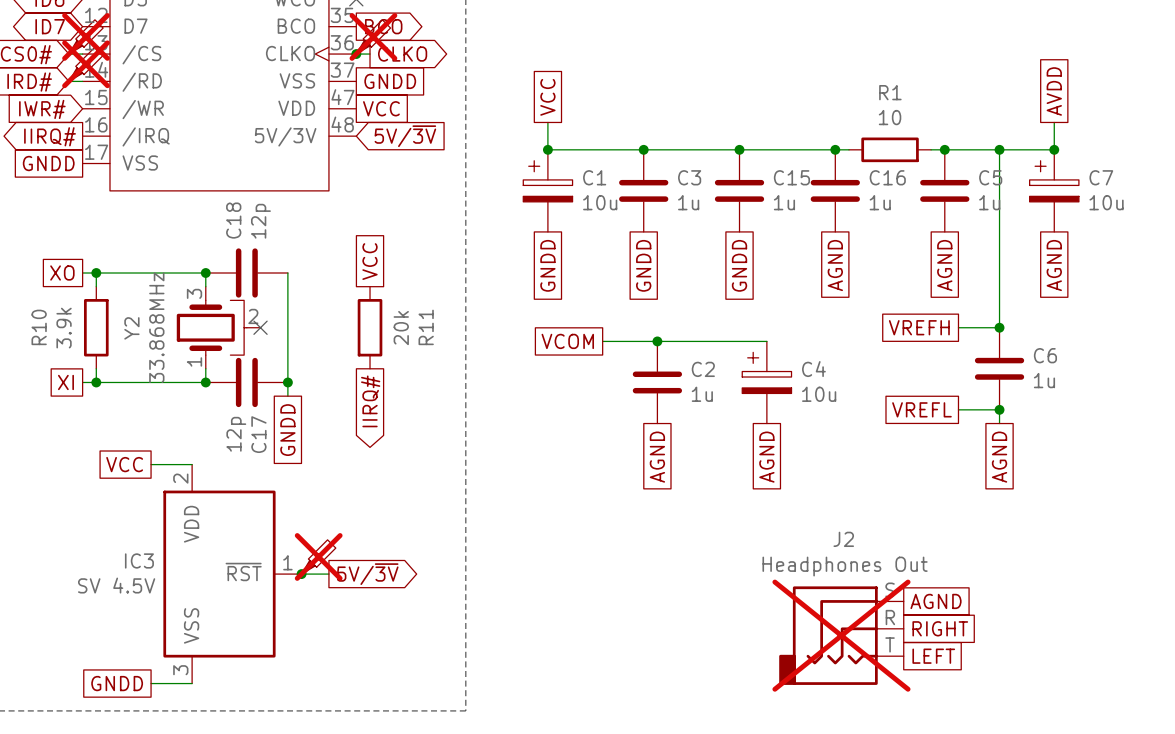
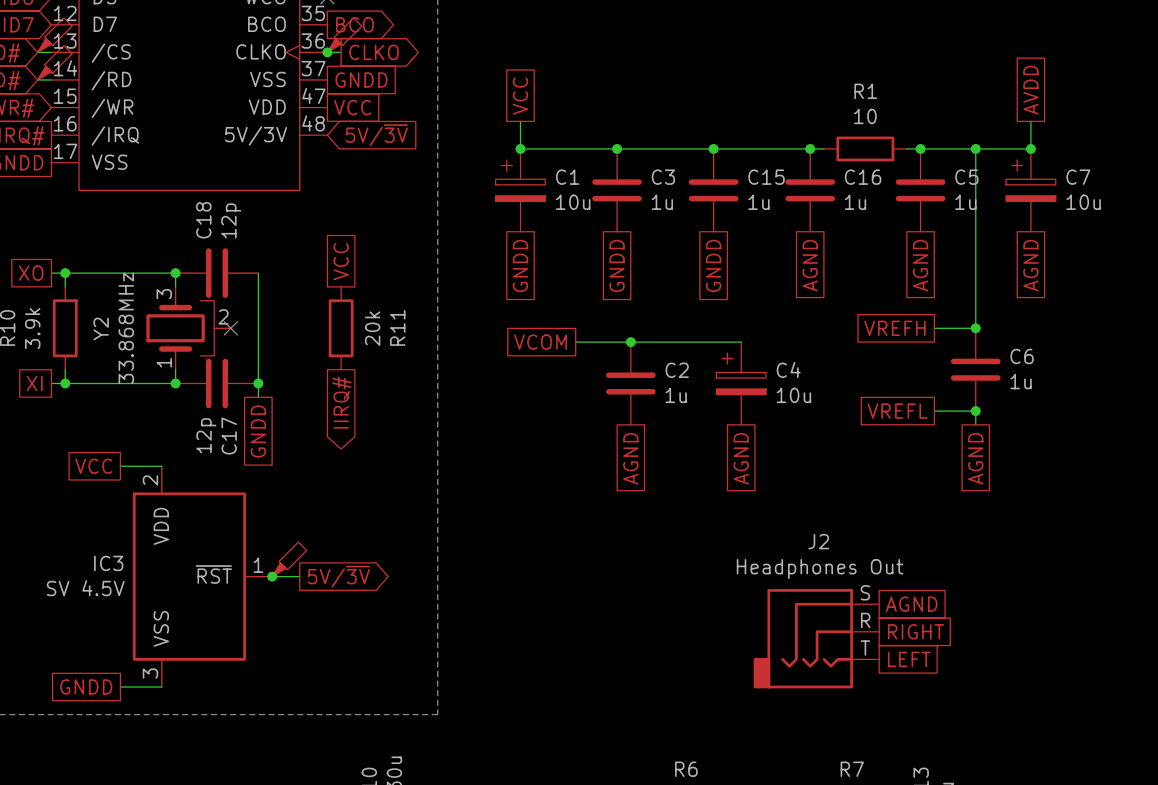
part do-not-place cross: (86, 36) -> none
part do-not-place cross: (373, 36) -> none
part do-not-place cross: (86, 64) -> none
part do-not-place cross: (318, 556) -> none
J2 do-not-place cross: (841, 635) -> none

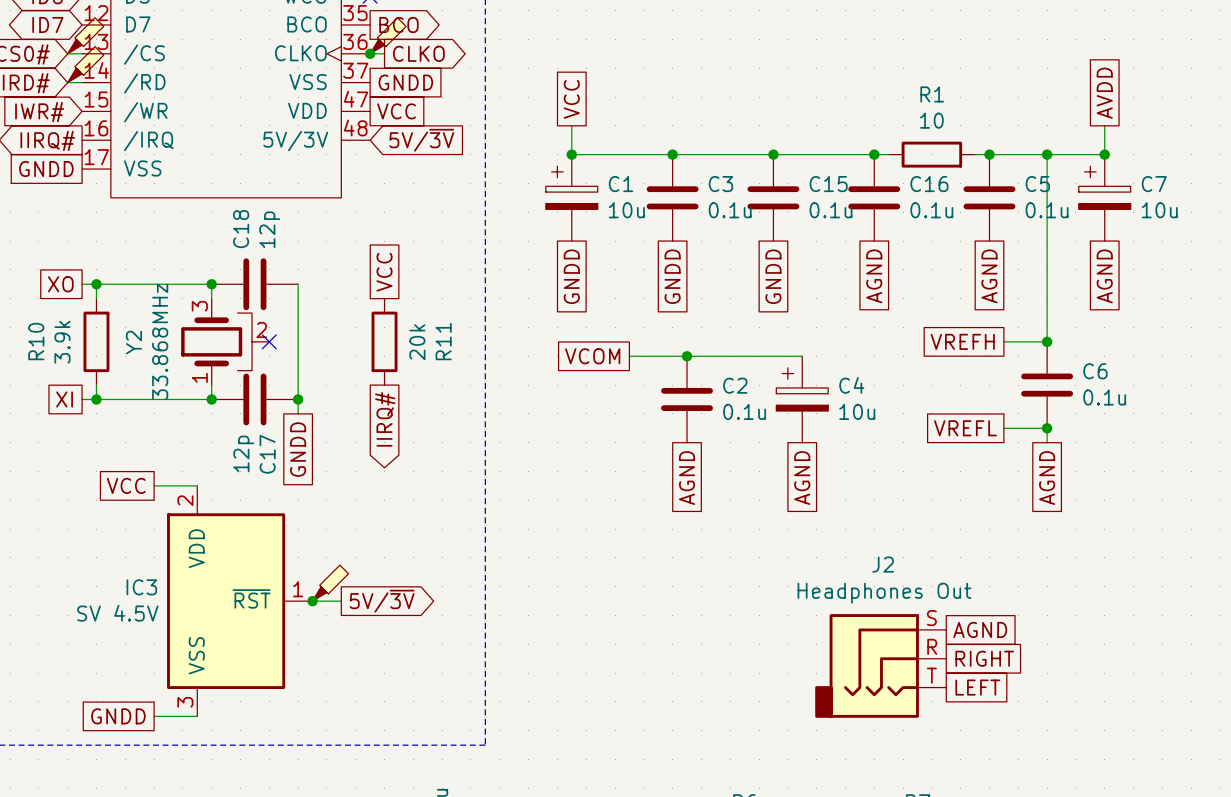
C3 value: 1u (662, 202) -> 0.1u (730, 210)
C15 value: 1u (758, 202) -> 0.1u (831, 210)
C16 value: 1u (855, 202) -> 0.1u (931, 210)
C5 value: 1u (965, 202) -> 0.1u (1047, 210)
C6 value: 1u (1021, 381) -> 0.1u (1104, 397)
C2 value: 1u (676, 395) -> 0.1u (744, 411)

